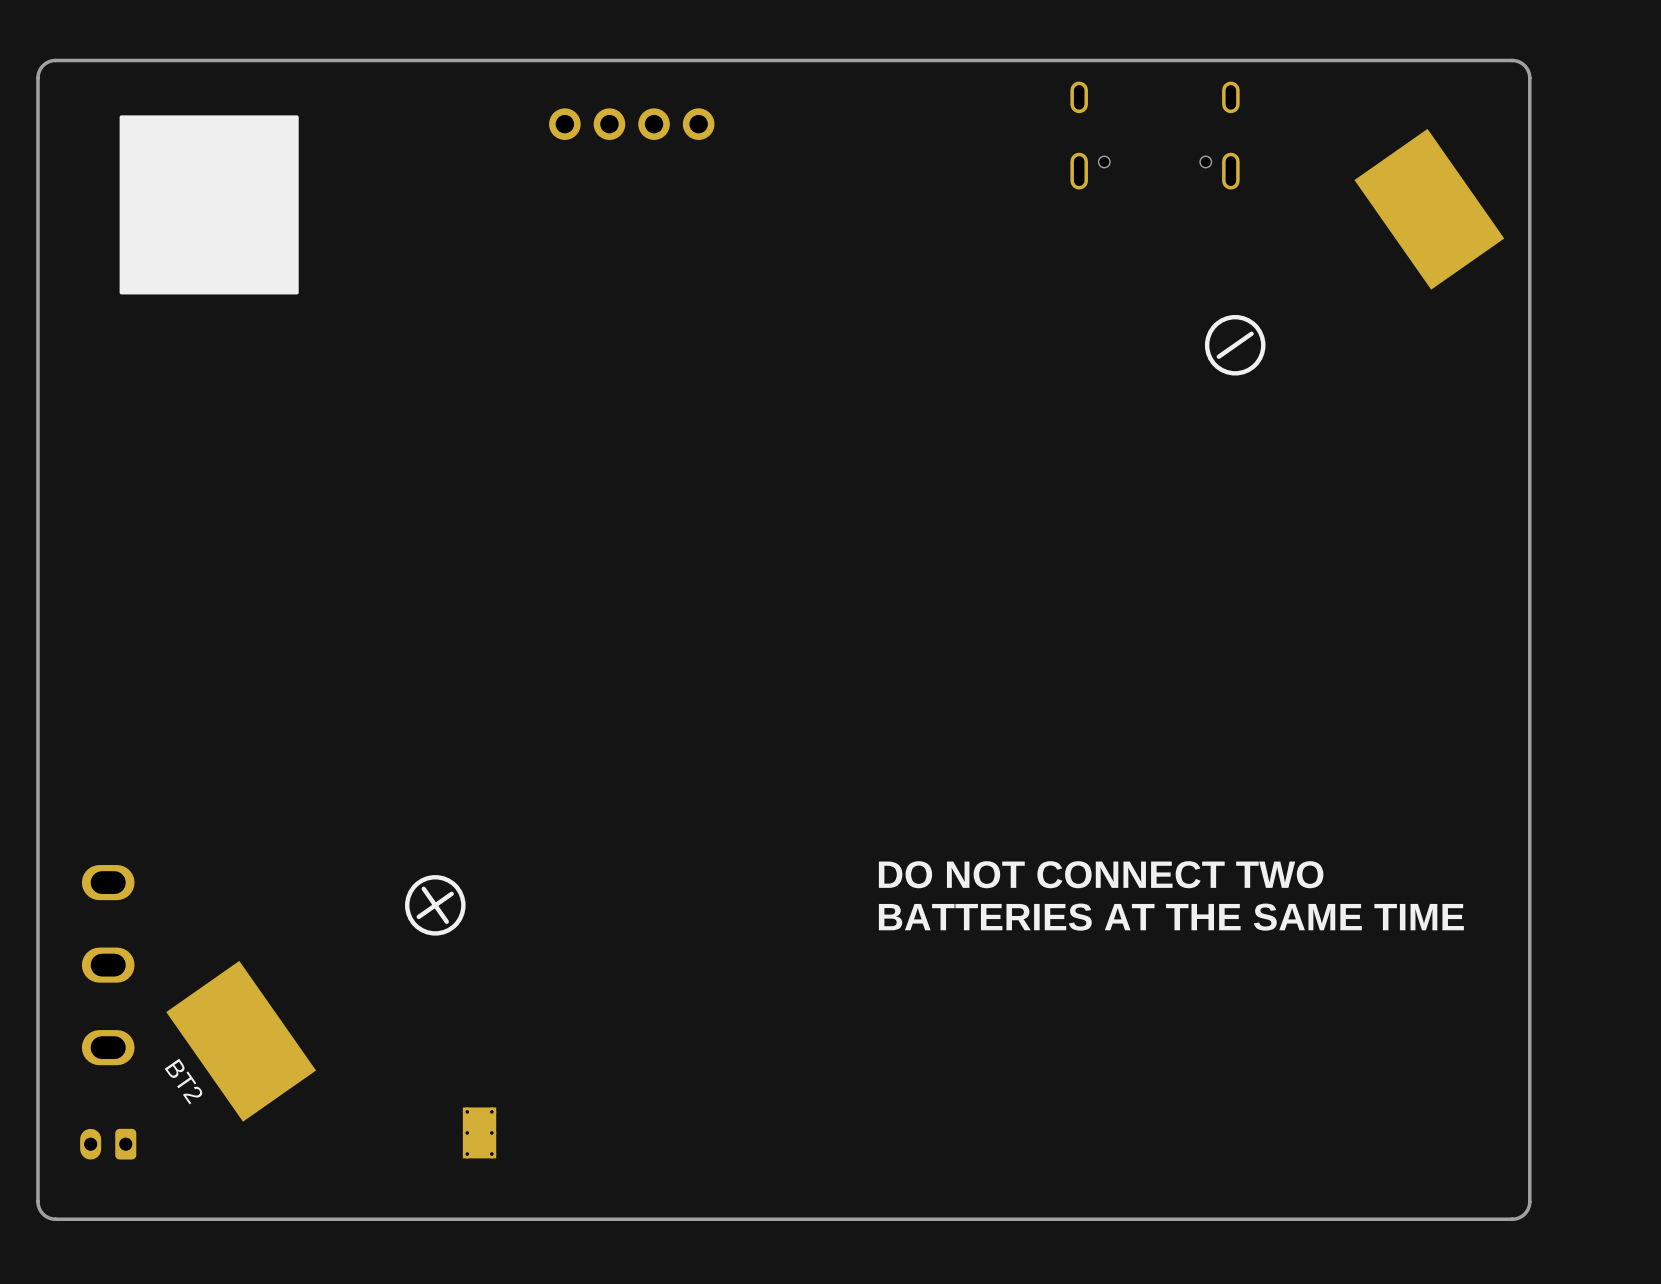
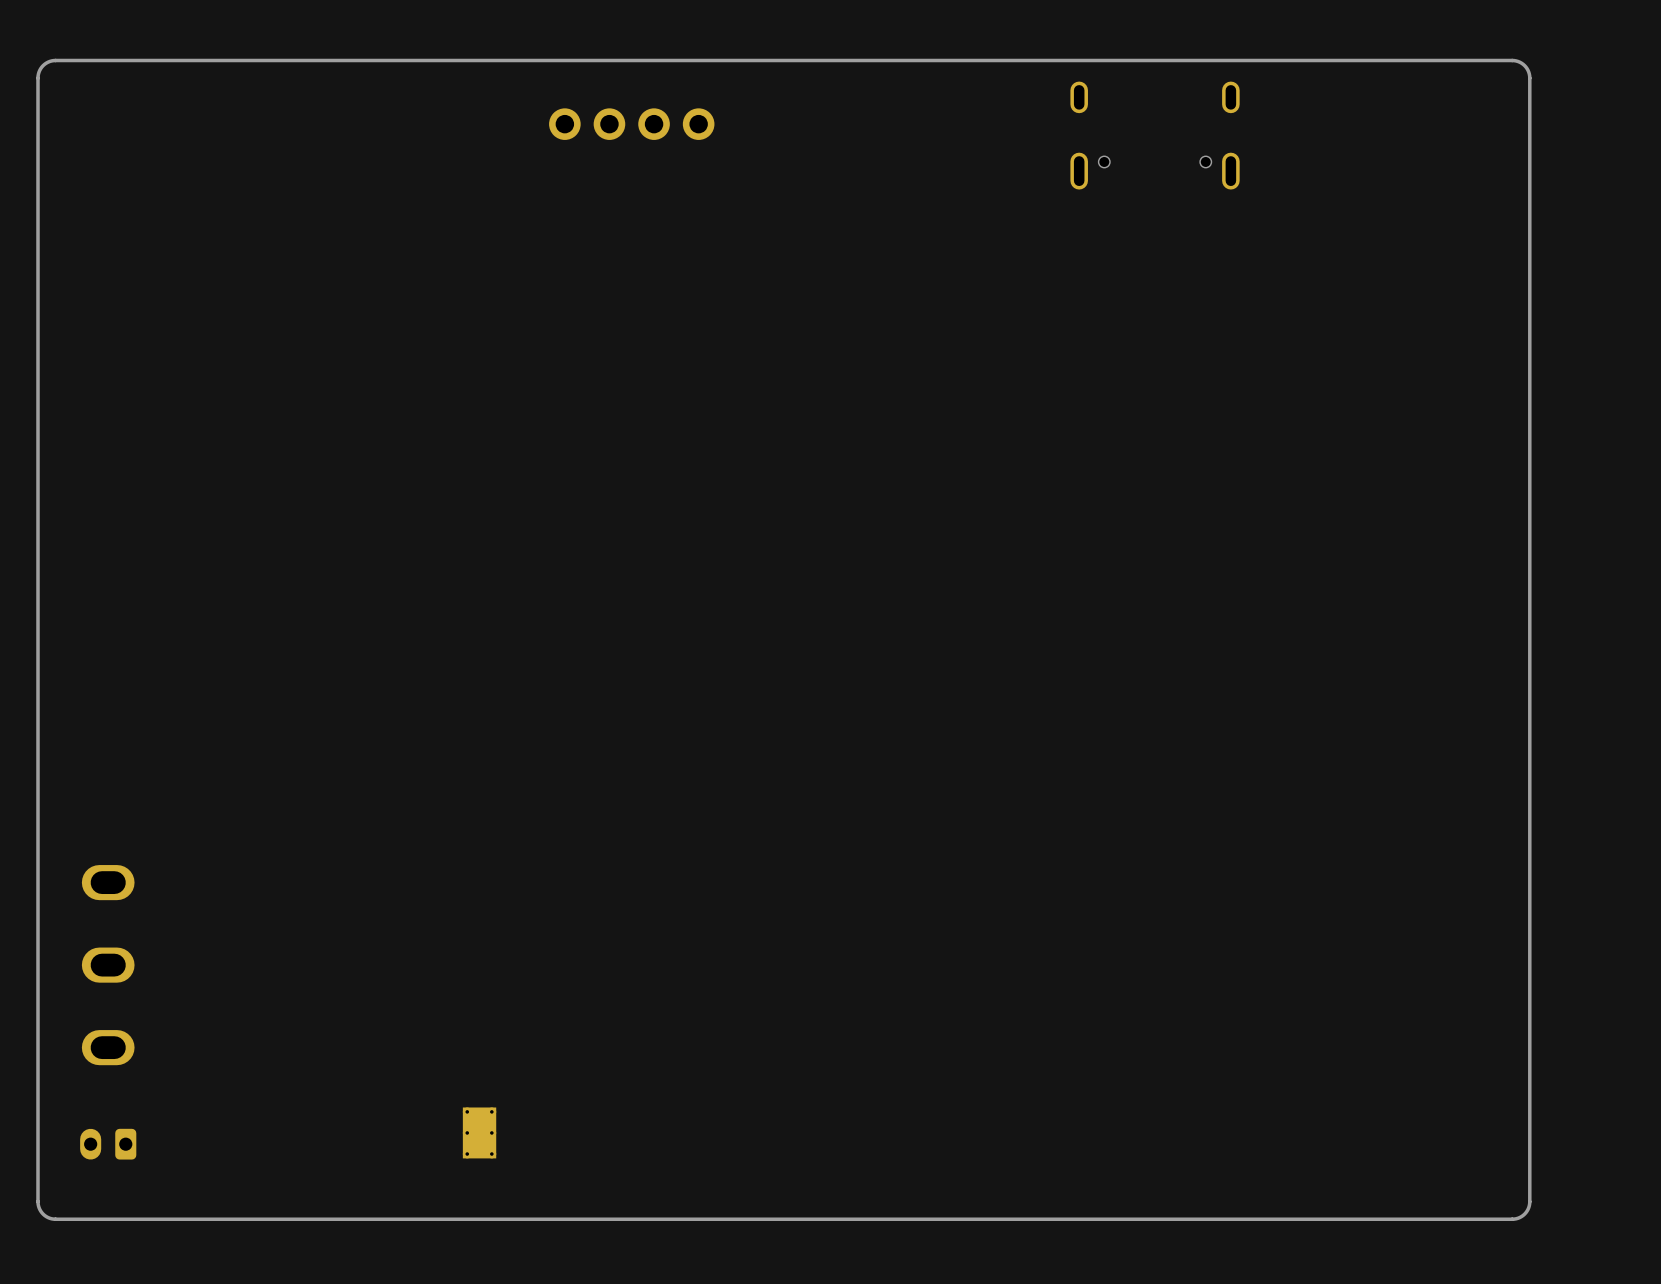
drawing: [119, 115, 299, 295] -> none
BT2: (835, 625) -> none
text: DO NOT CONNECT TWO (1101, 874) -> none
text: BATTERIES AT THE SAME TIME (1171, 917) -> none

